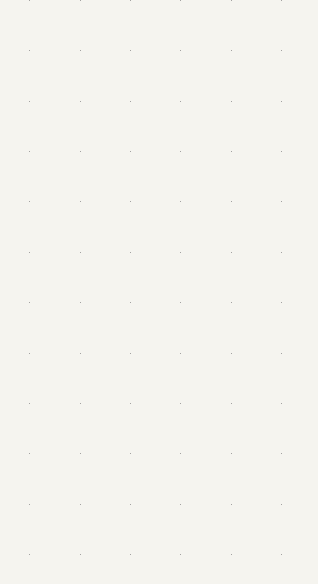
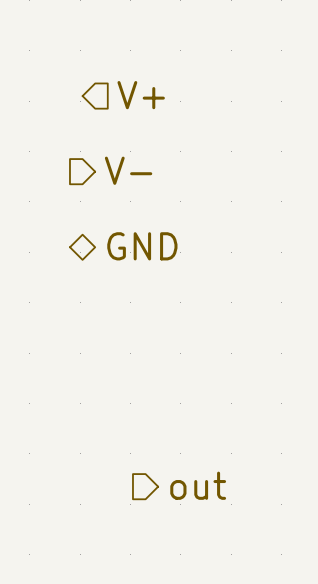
hierarchical label: none -> V+ (141, 95)
hierarchical label: none -> V- (128, 170)
hierarchical label: none -> GND (142, 246)
hierarchical label: none -> out (198, 485)

